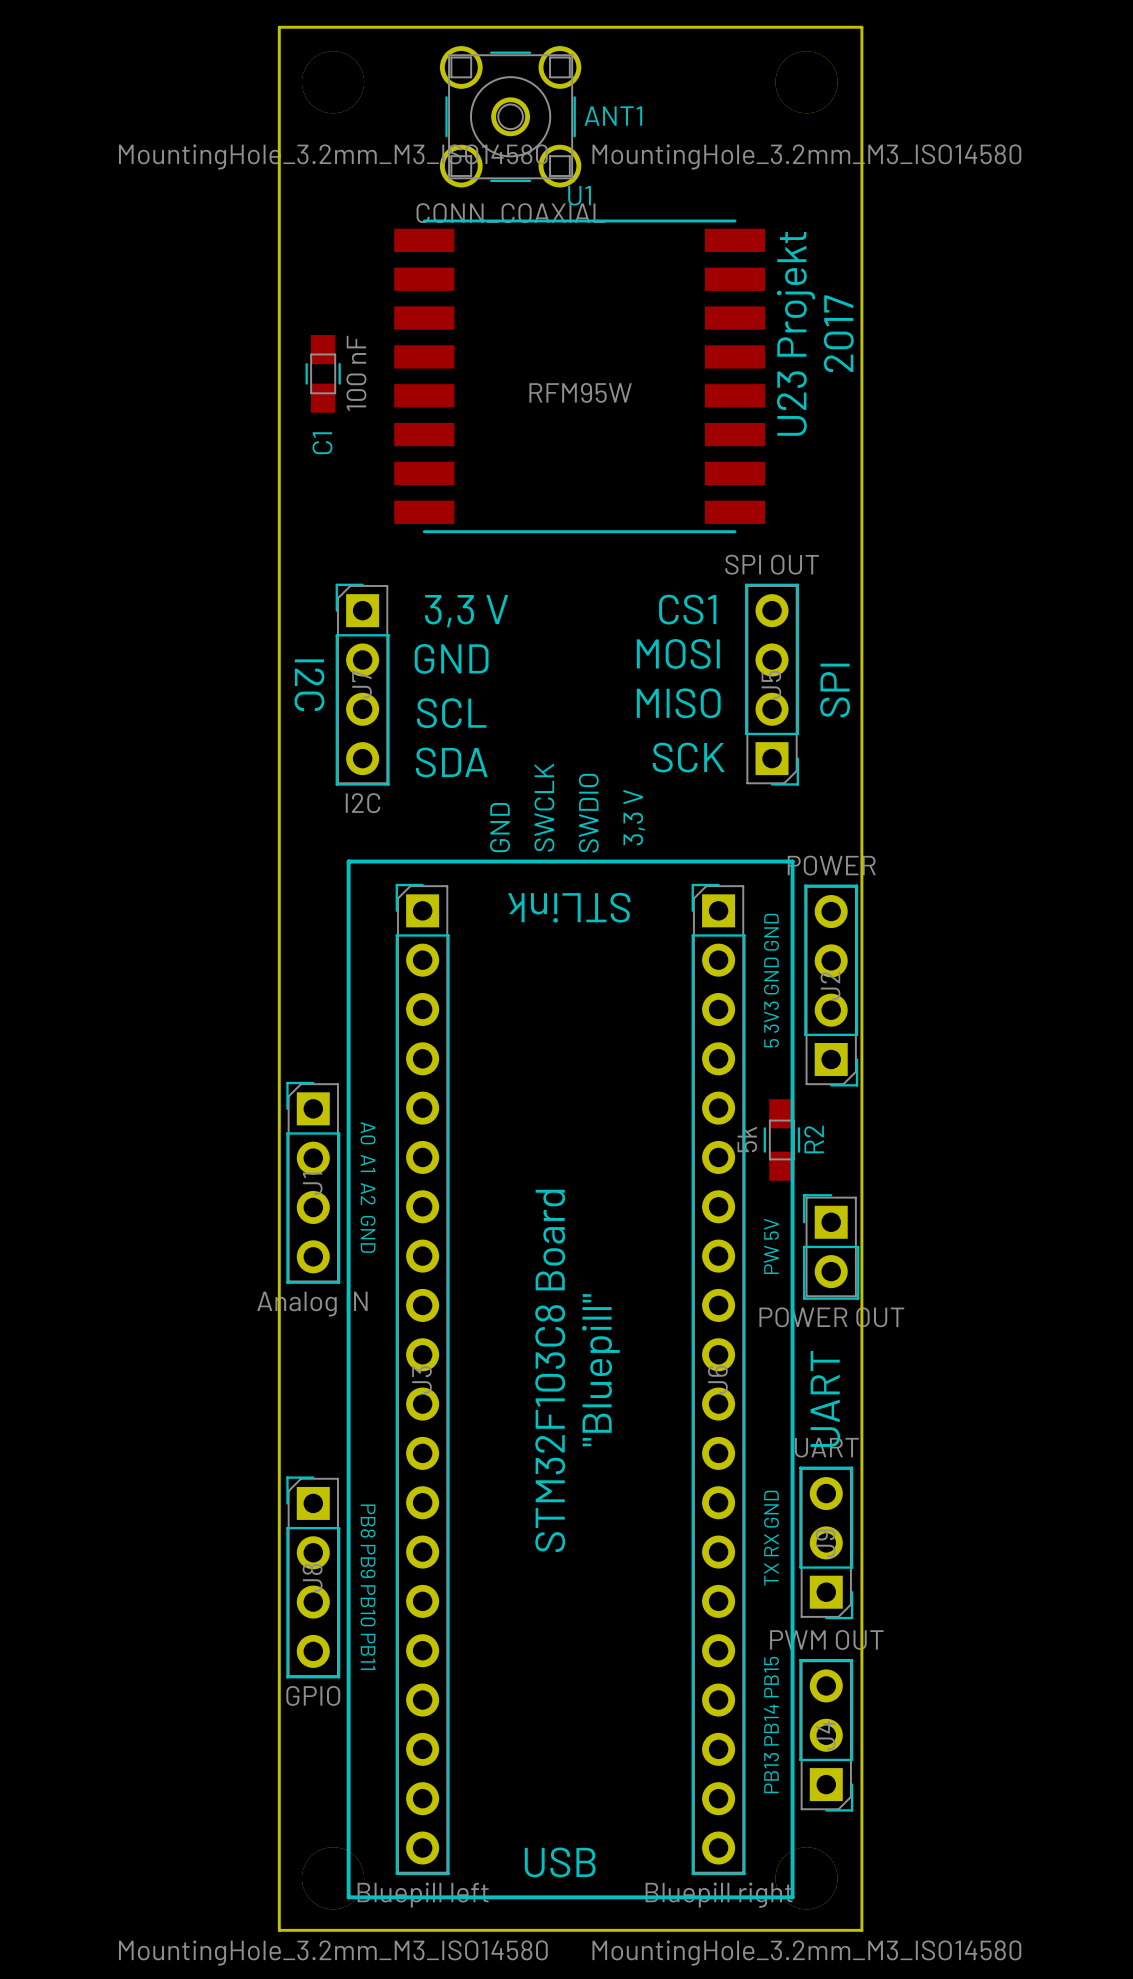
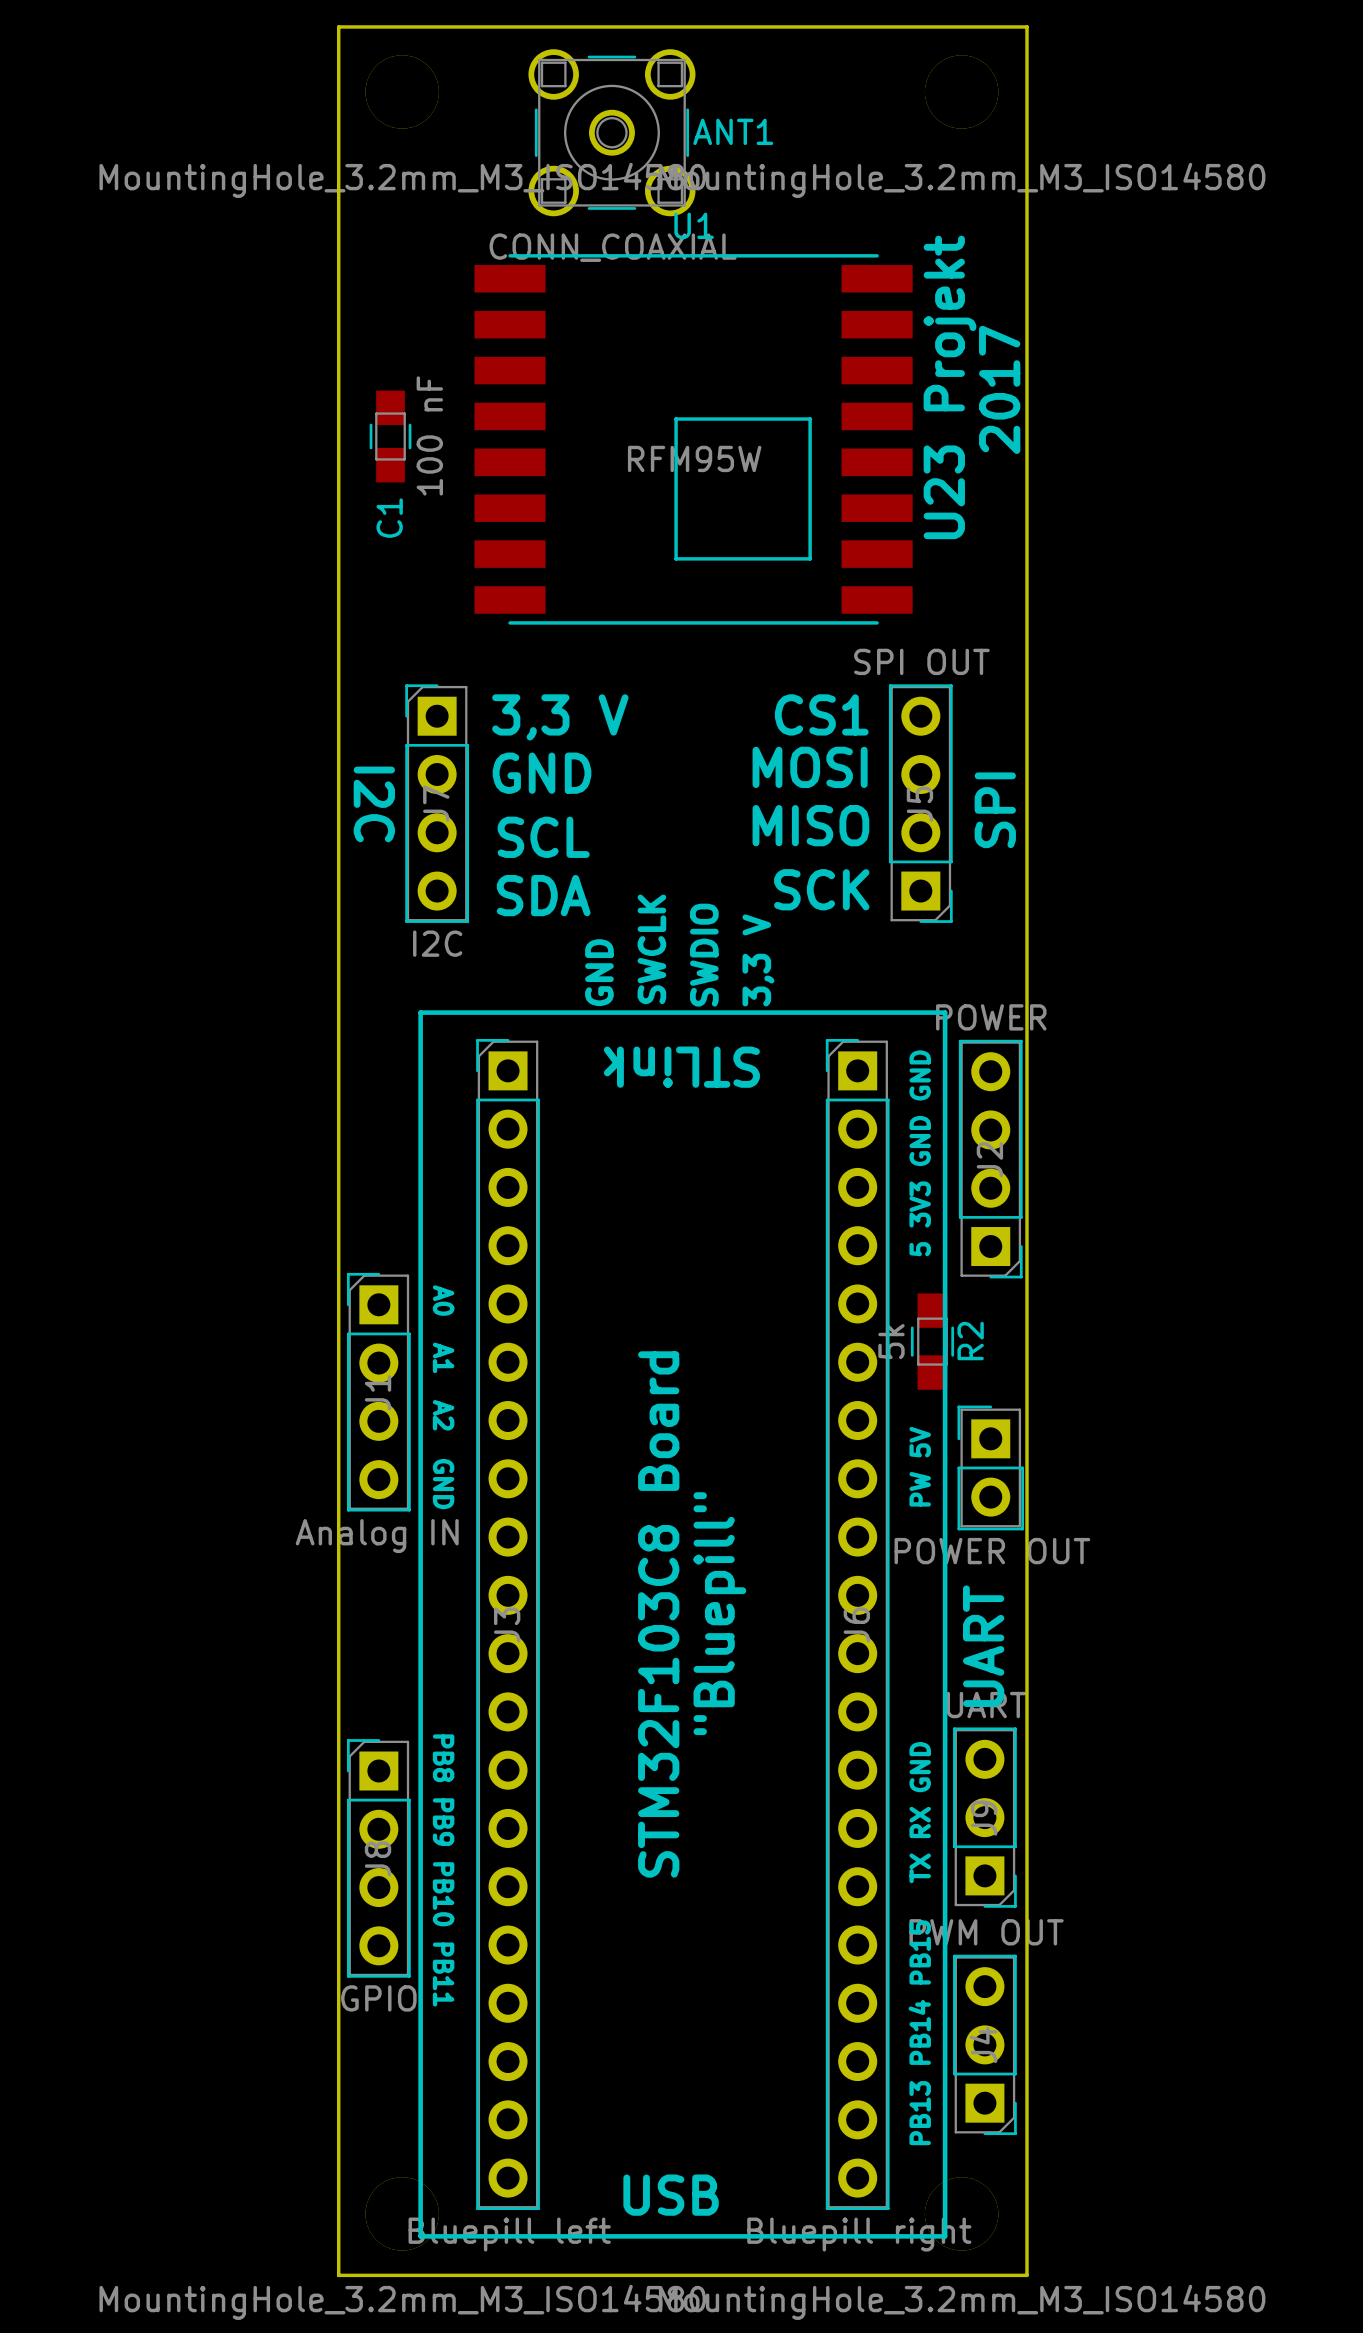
U1 footprint: [394, 219, 766, 534] -> [474, 254, 913, 625]

